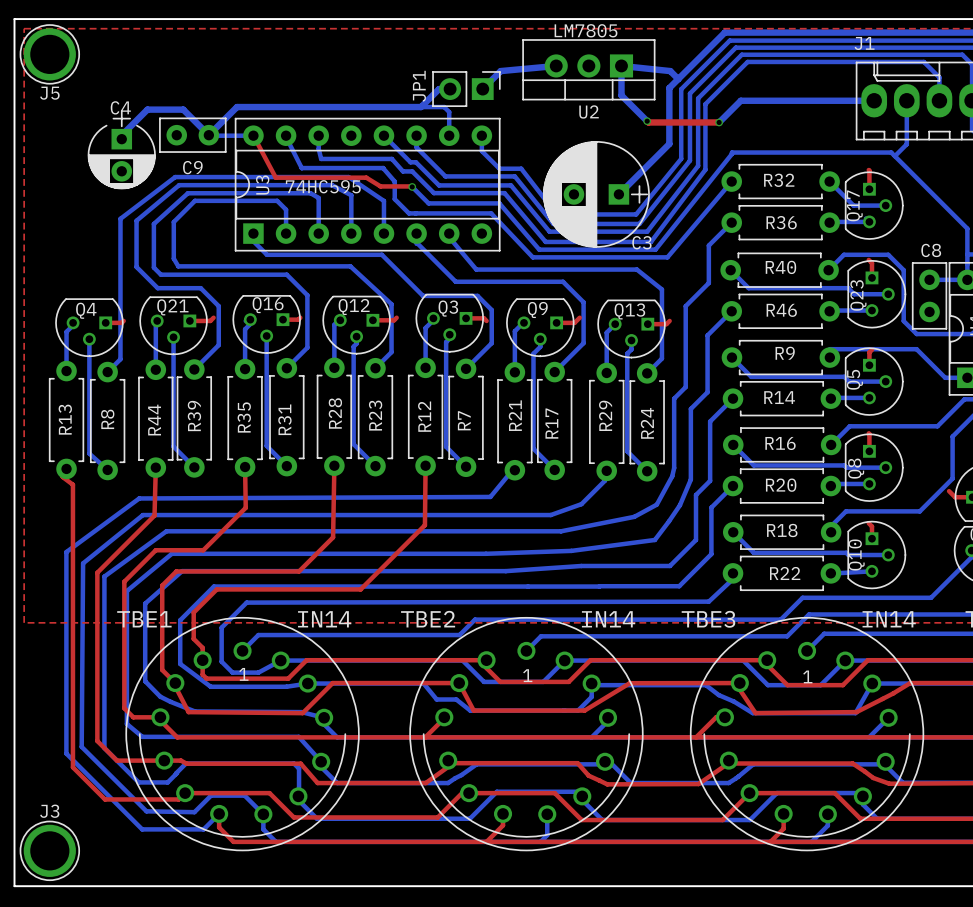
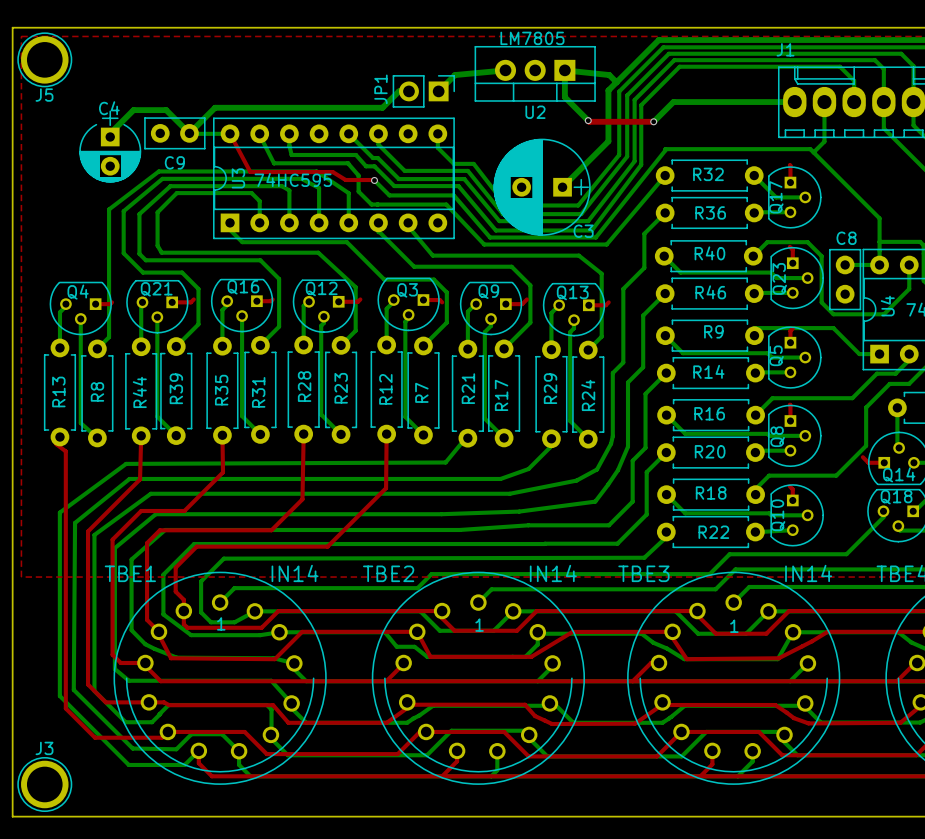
bottom track: (421, 107) (444, 107) (449, 112) (449, 135) -> none

